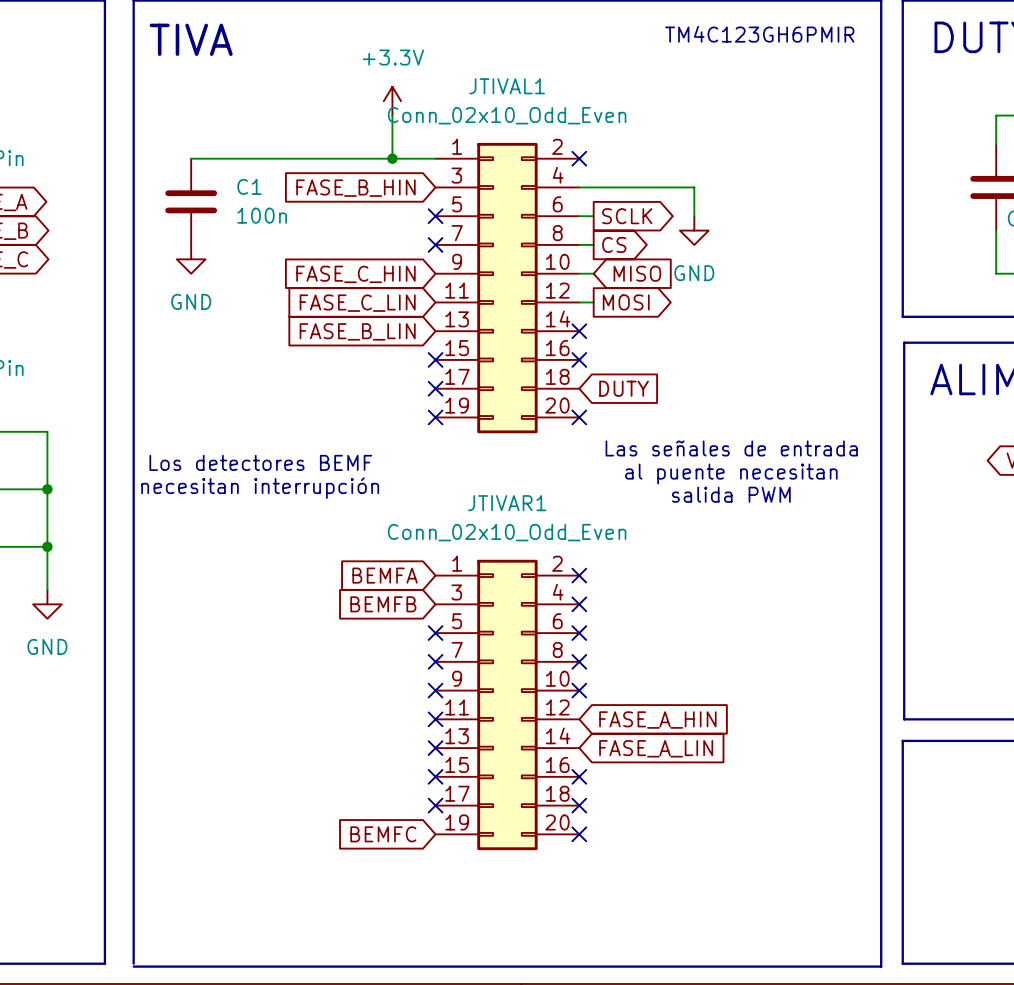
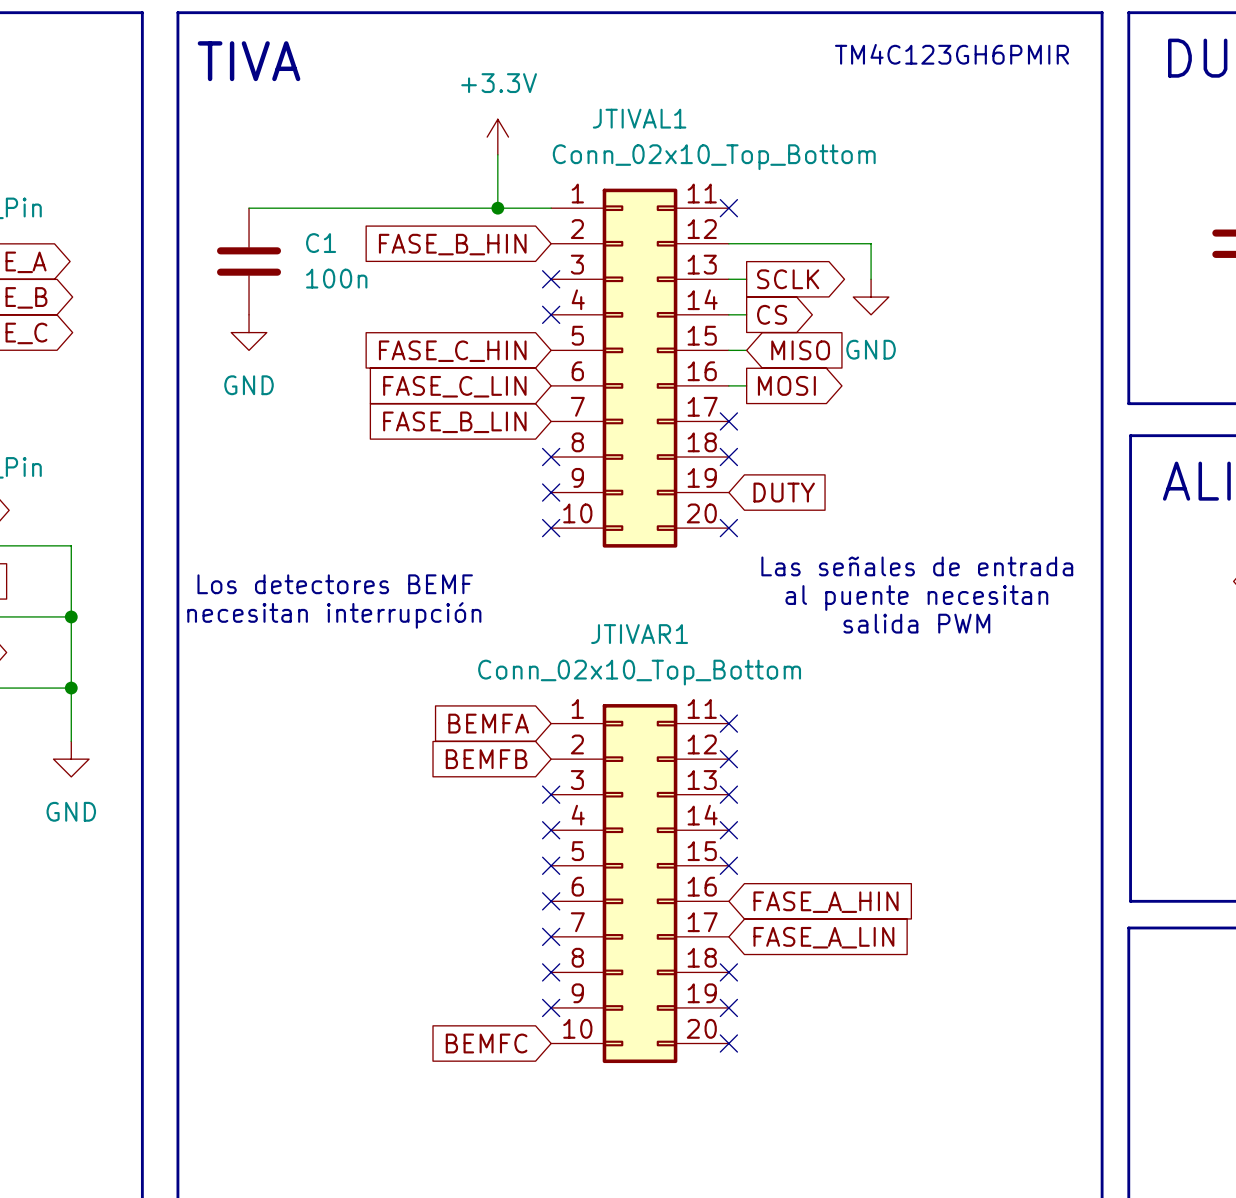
JTIVAL1 value: Conn_02x10_Odd_Even (507, 115) -> Conn_02x10_Top_Bottom (714, 157)
JTIVAL1 symbol: [435, 142, 580, 434] -> [551, 188, 729, 548]
JTIVAR1 value: Conn_02x10_Odd_Even (507, 532) -> Conn_02x10_Top_Bottom (639, 672)
JTIVAR1 symbol: [435, 559, 580, 851] -> [551, 704, 729, 1064]

